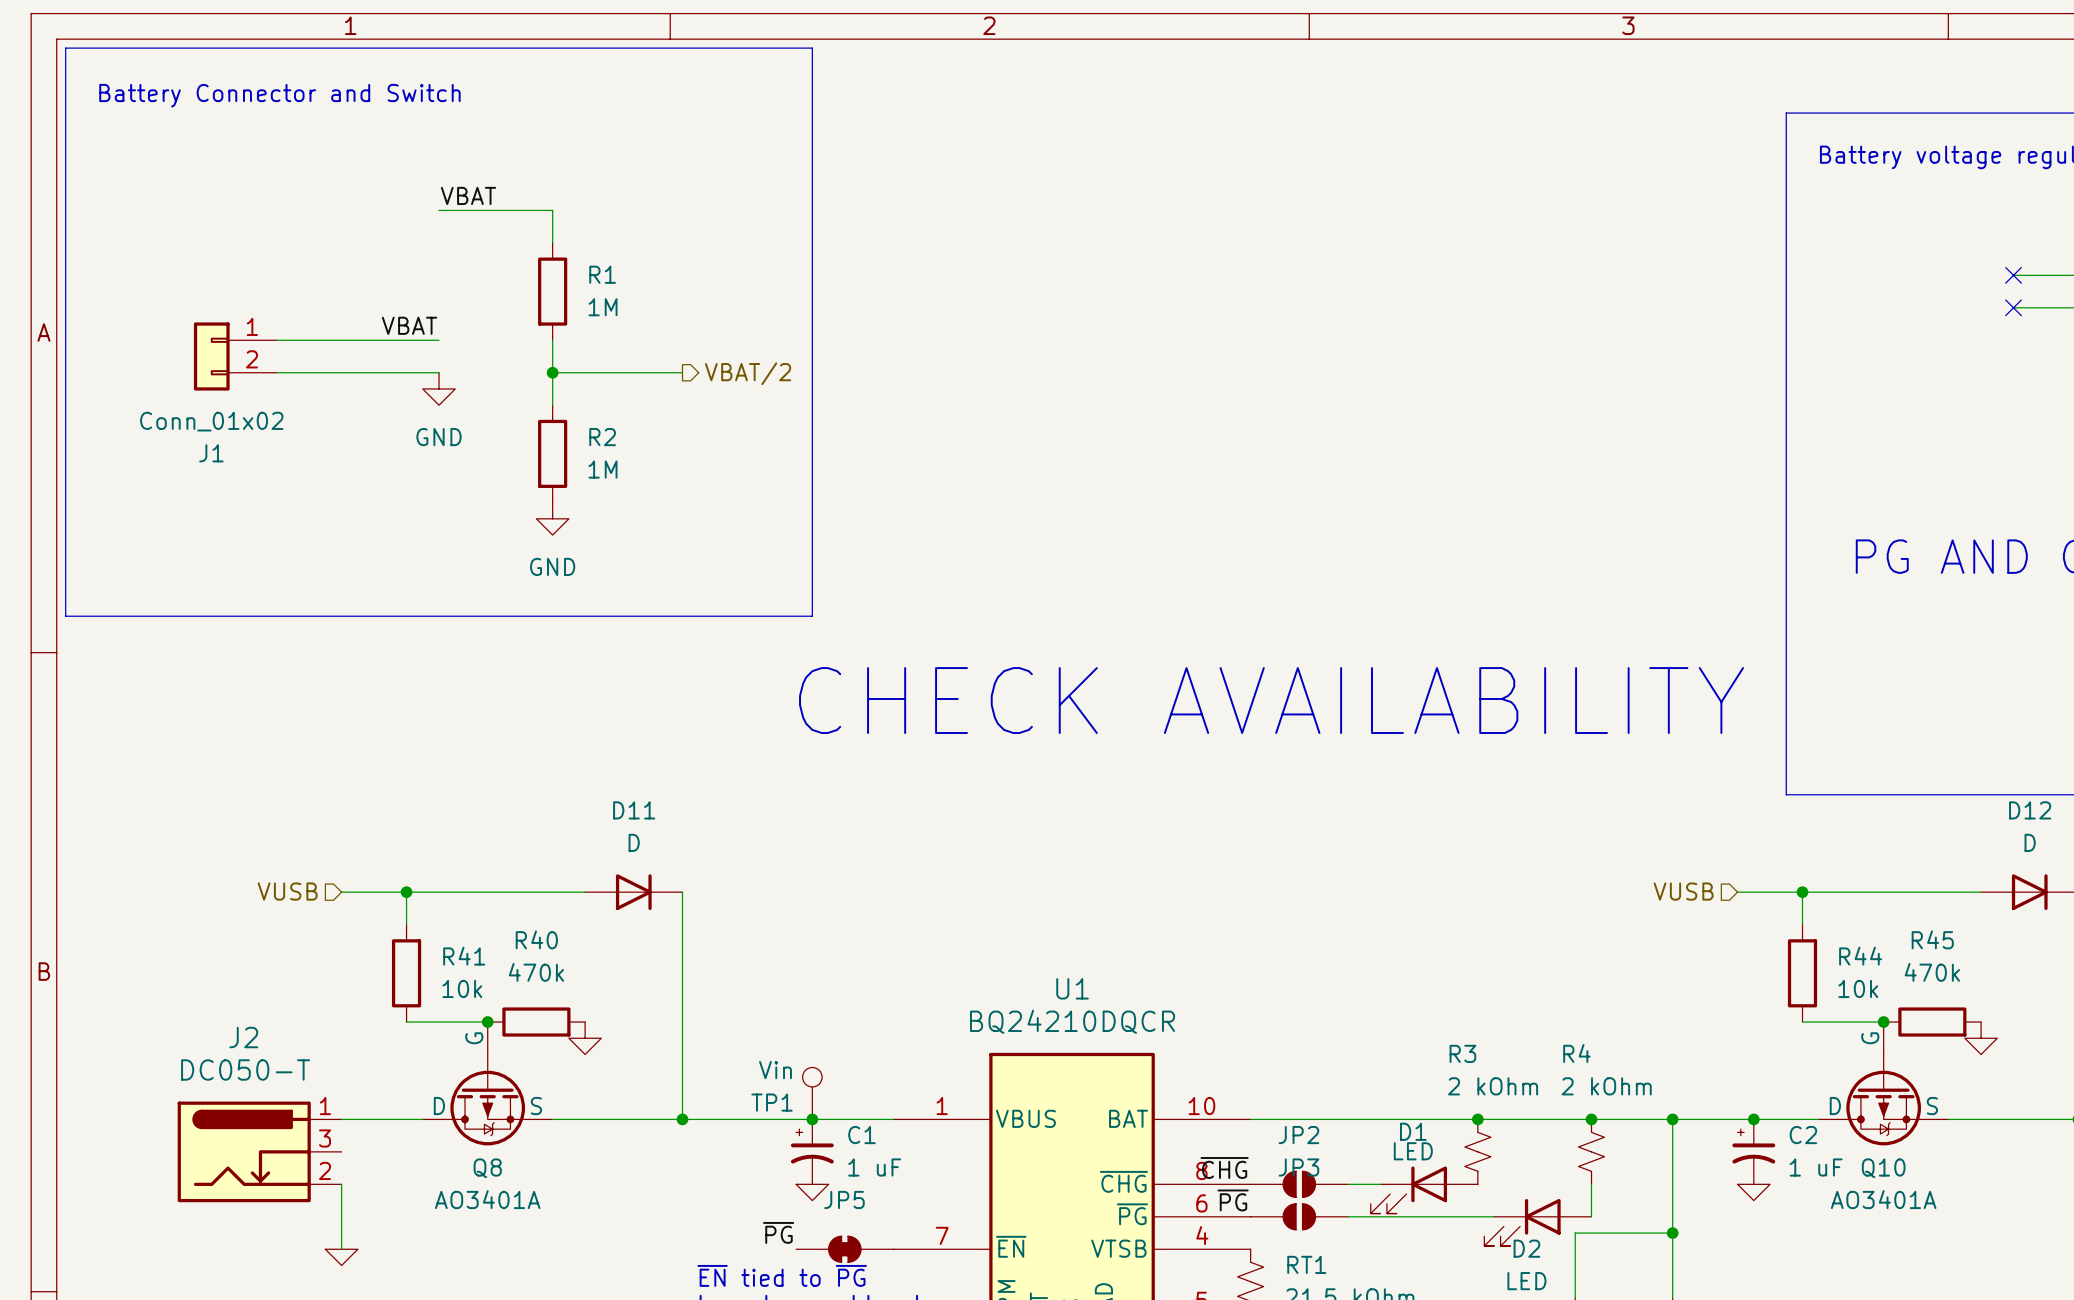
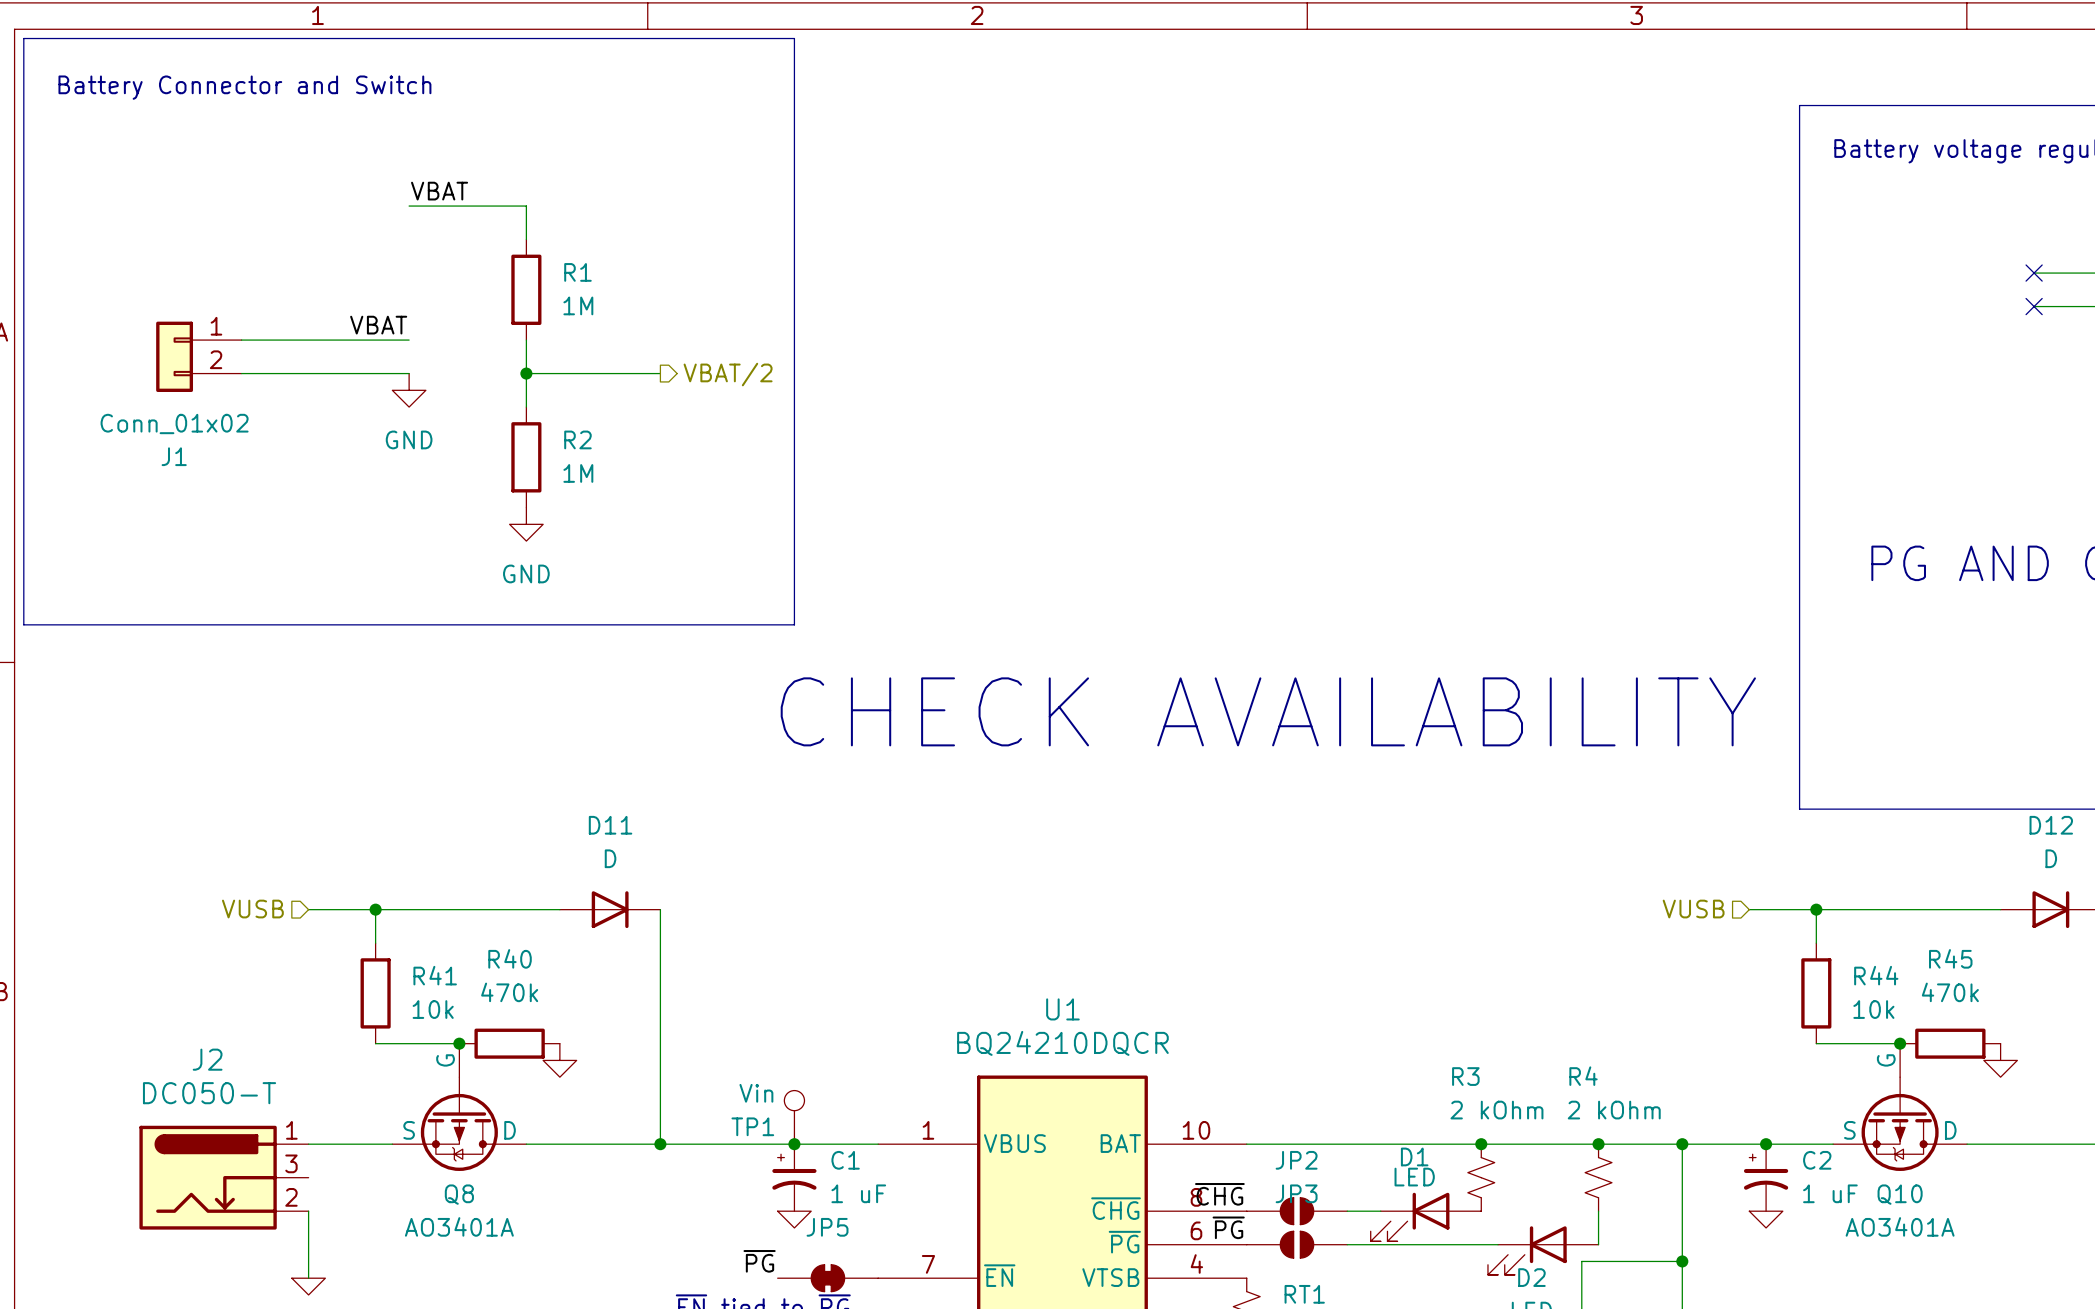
Q8 flip: as is (487, 1099) -> left-right (459, 1124)
Q10 flip: as is (1883, 1099) -> left-right (1900, 1124)

